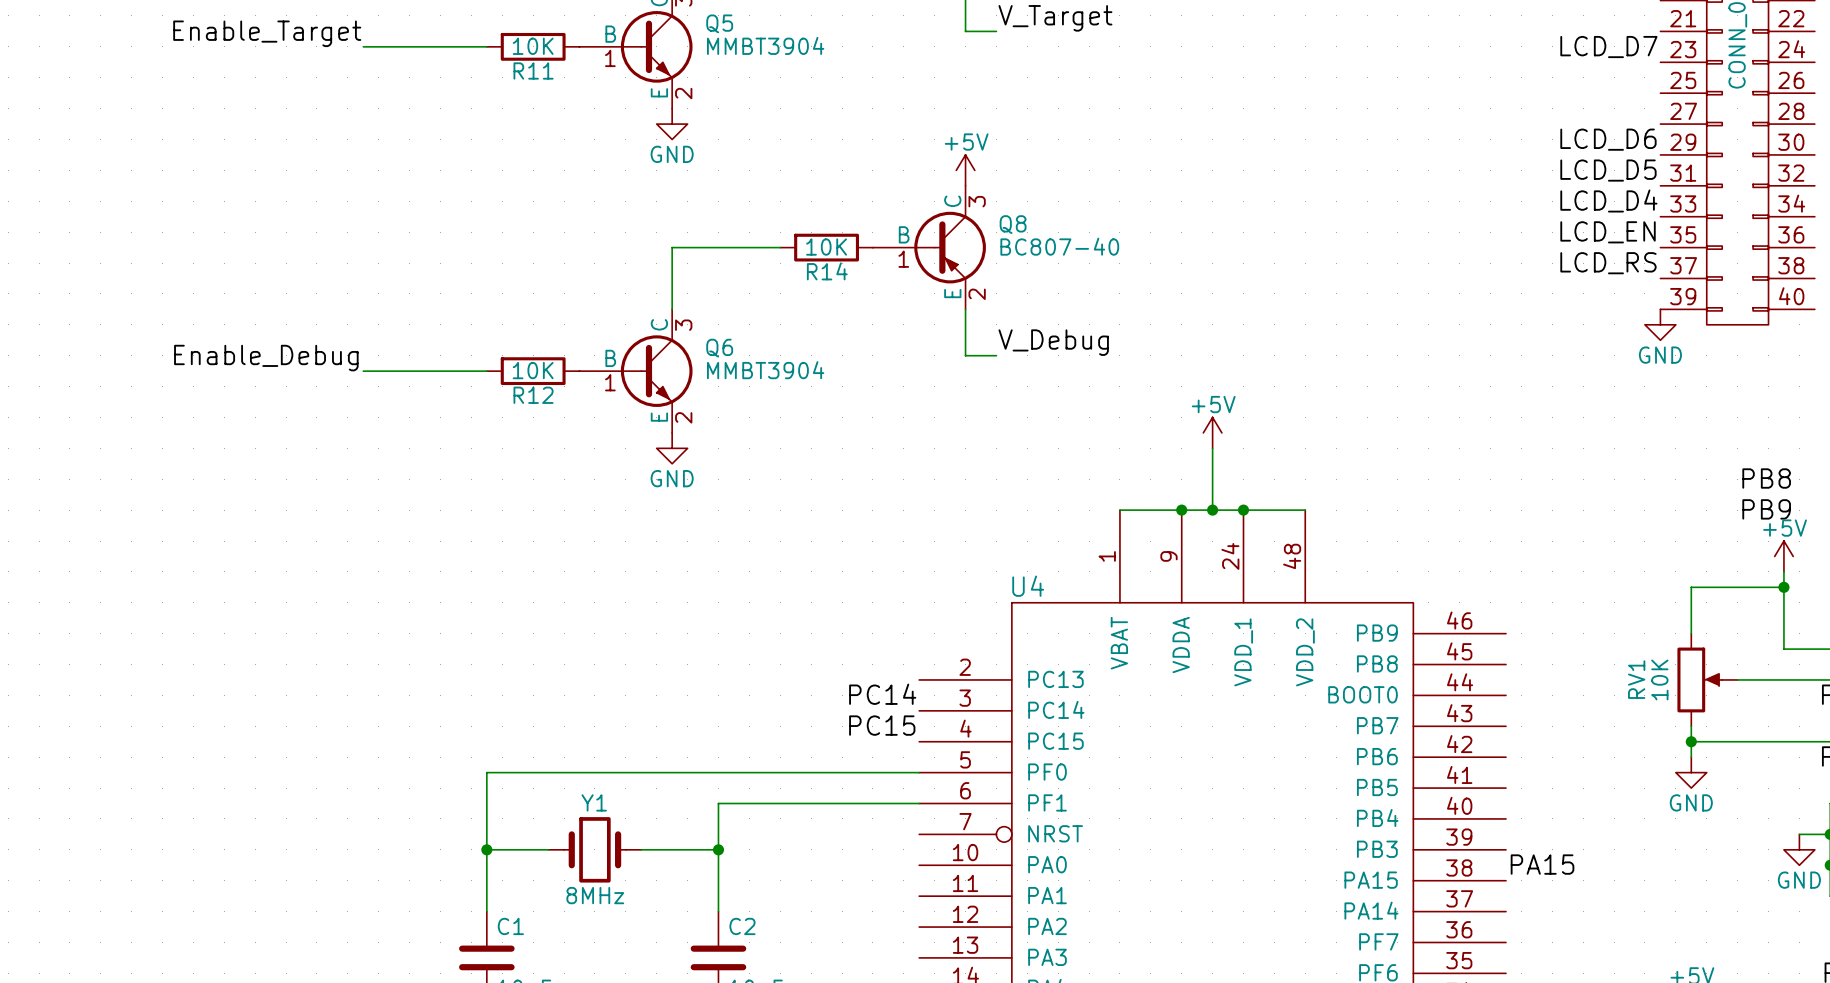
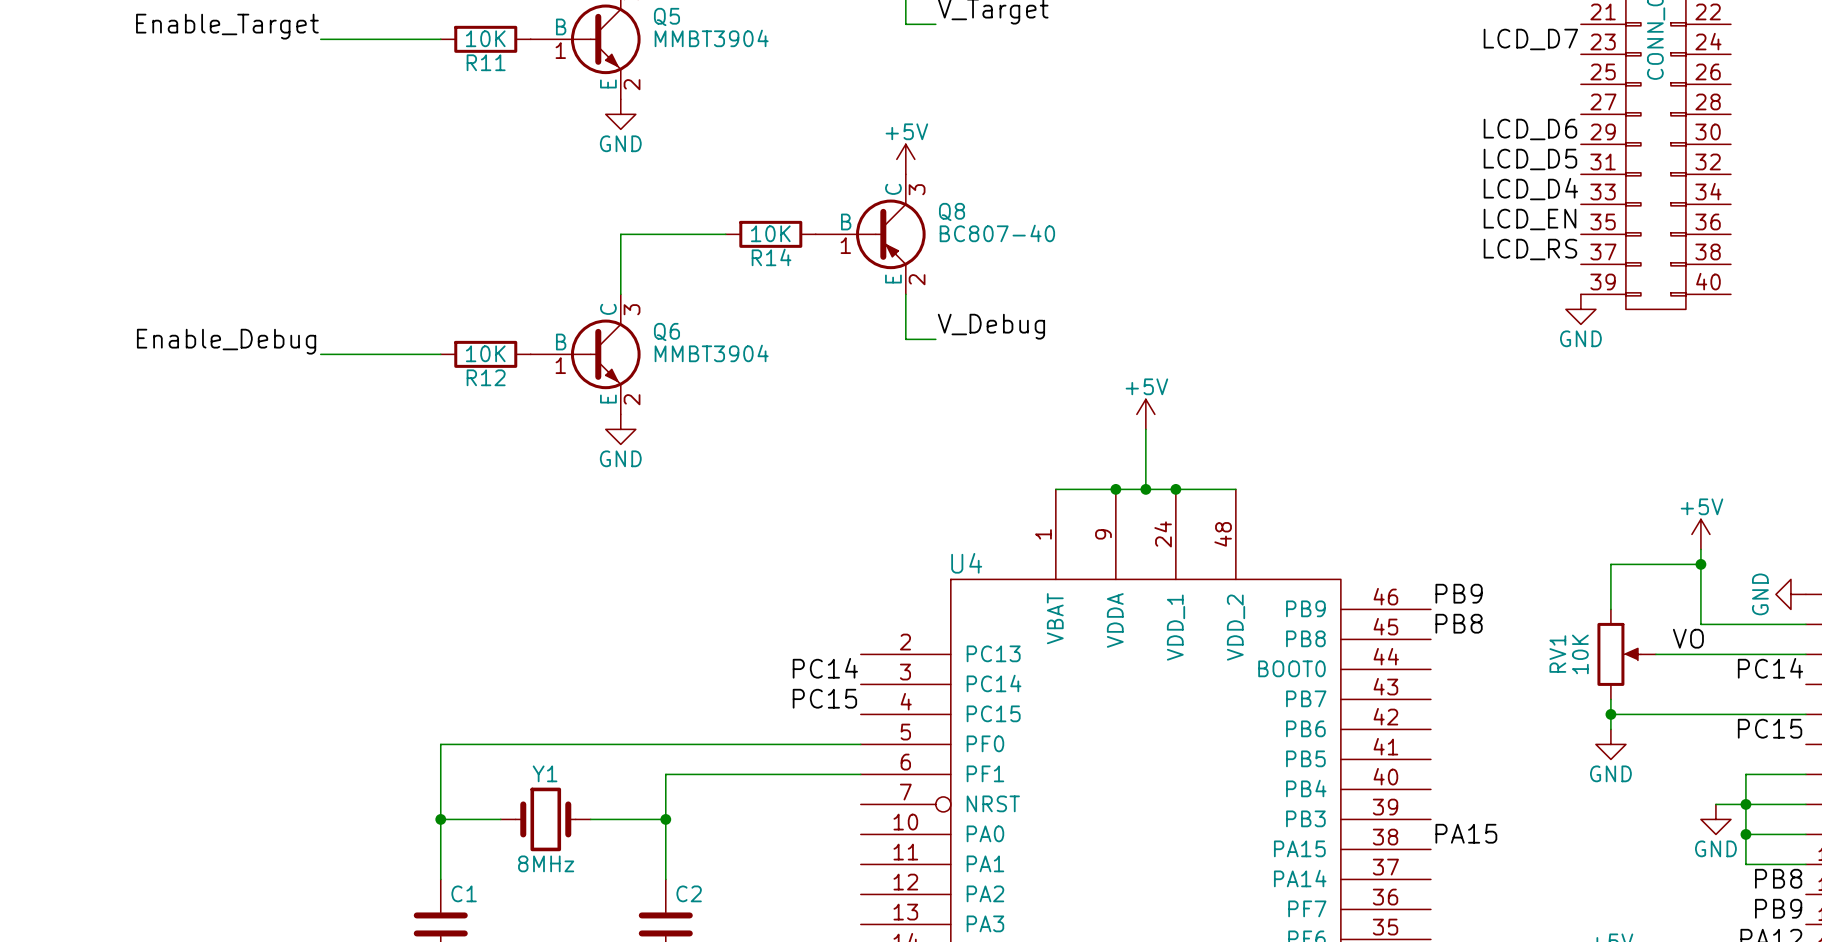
label position: PB8 (1766, 478) -> PB8 (1459, 623)
label position: PB9 (1766, 509) -> PB9 (1459, 593)
label: none -> VO (1688, 638)

